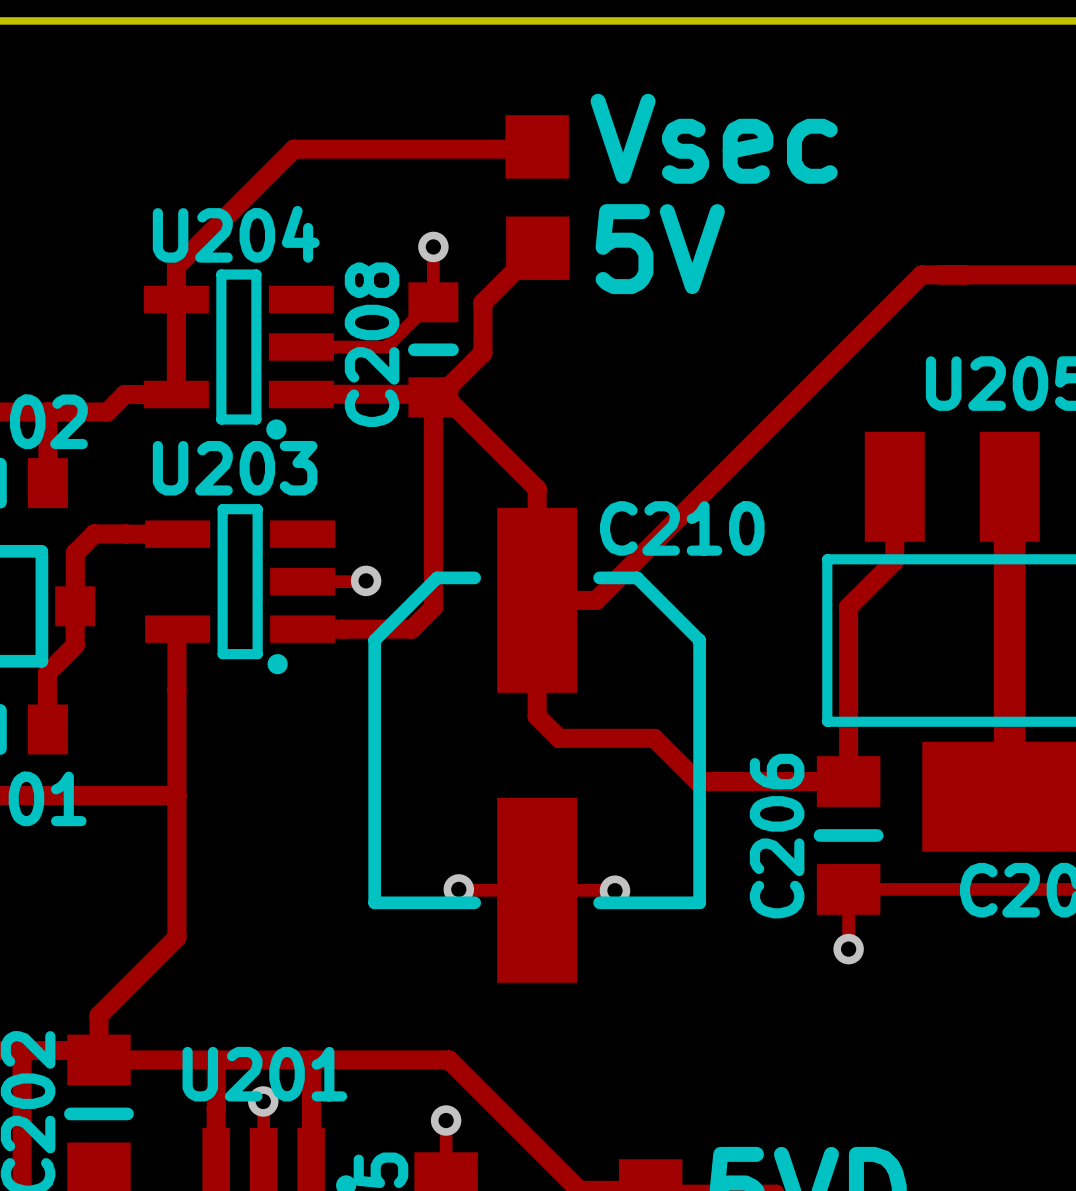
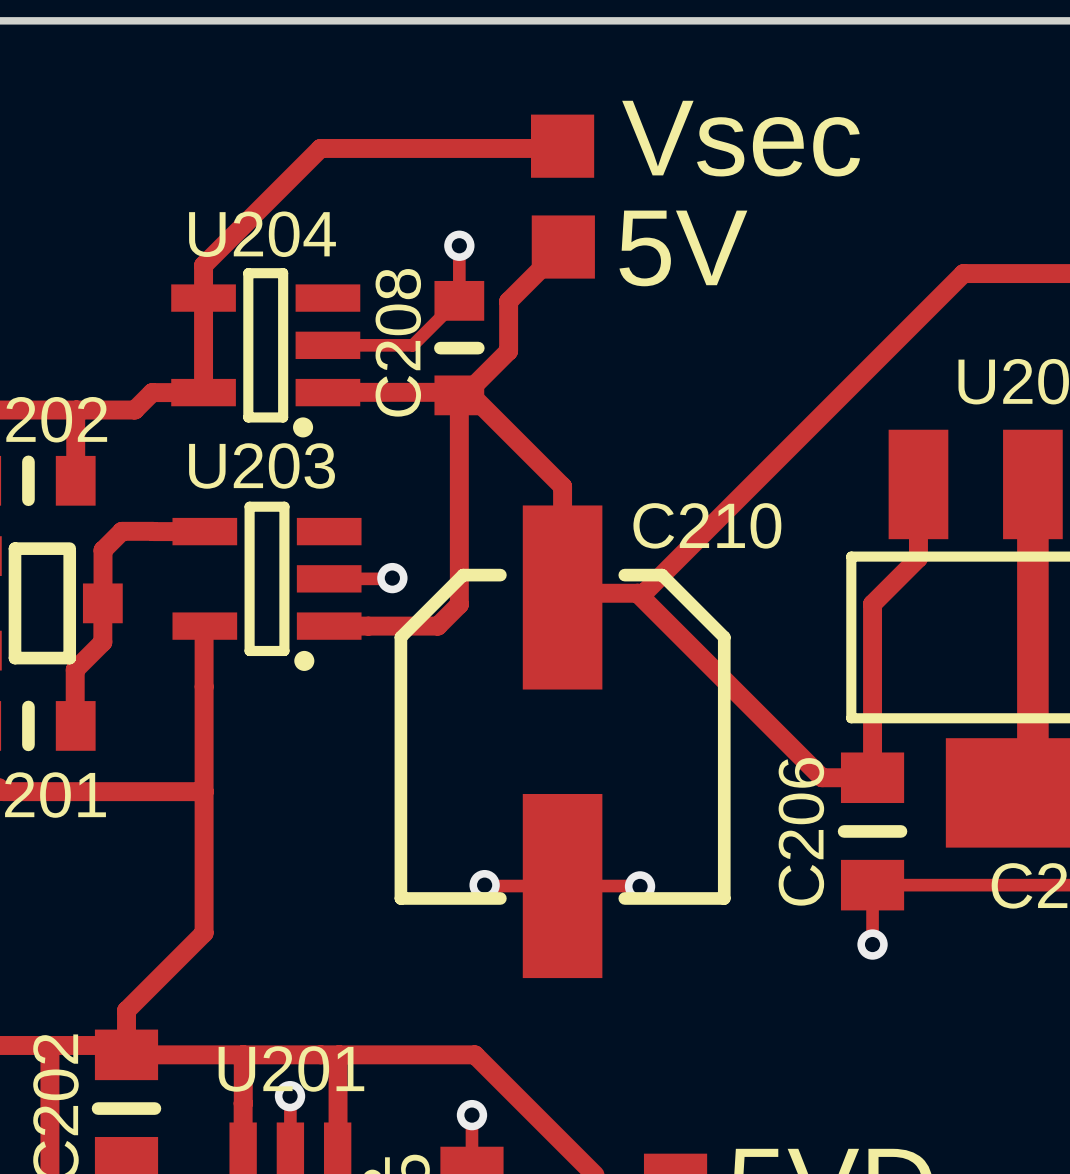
track: (940, 274) (921, 274) (596, 600) (537, 600) (537, 716) (559, 738) (654, 738) (697, 781) (797, 781) -> (963, 273) (643, 593) (573, 593)
track: none -> (637, 593) (822, 777)

